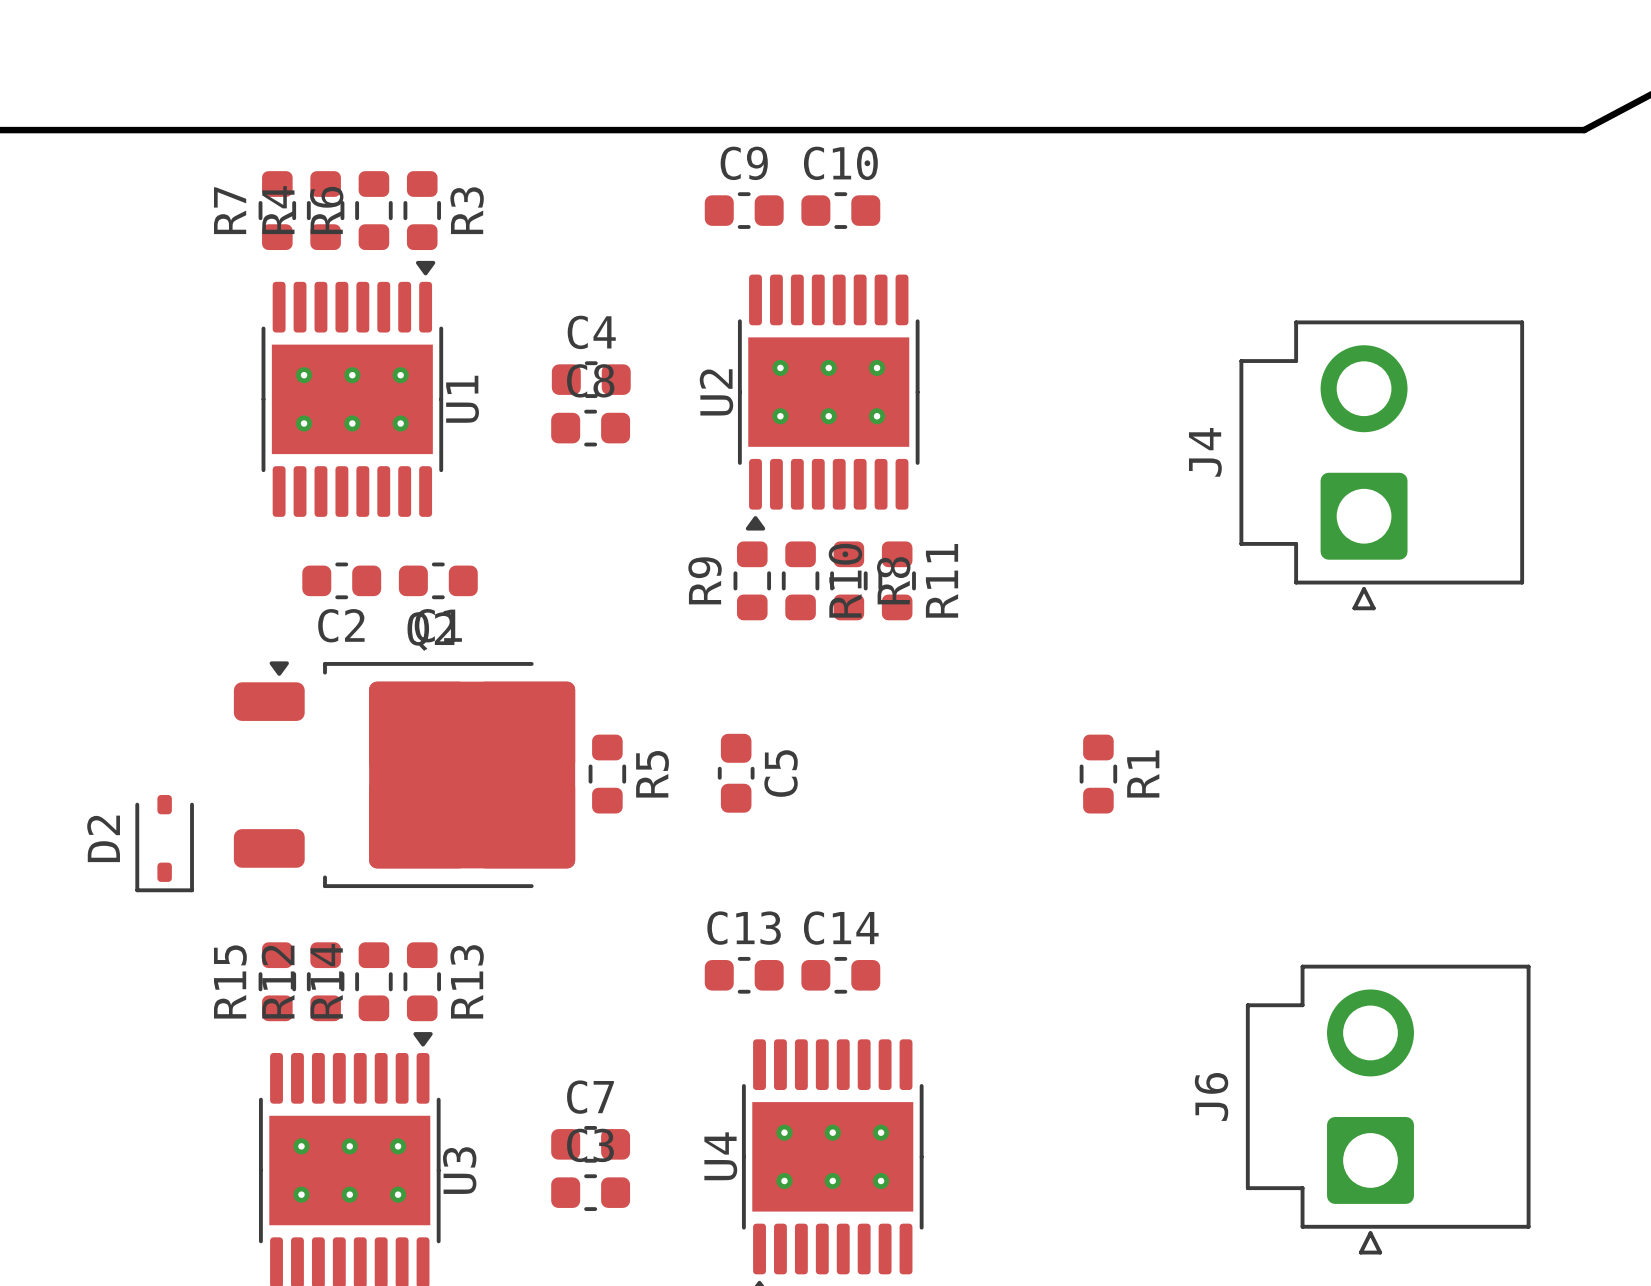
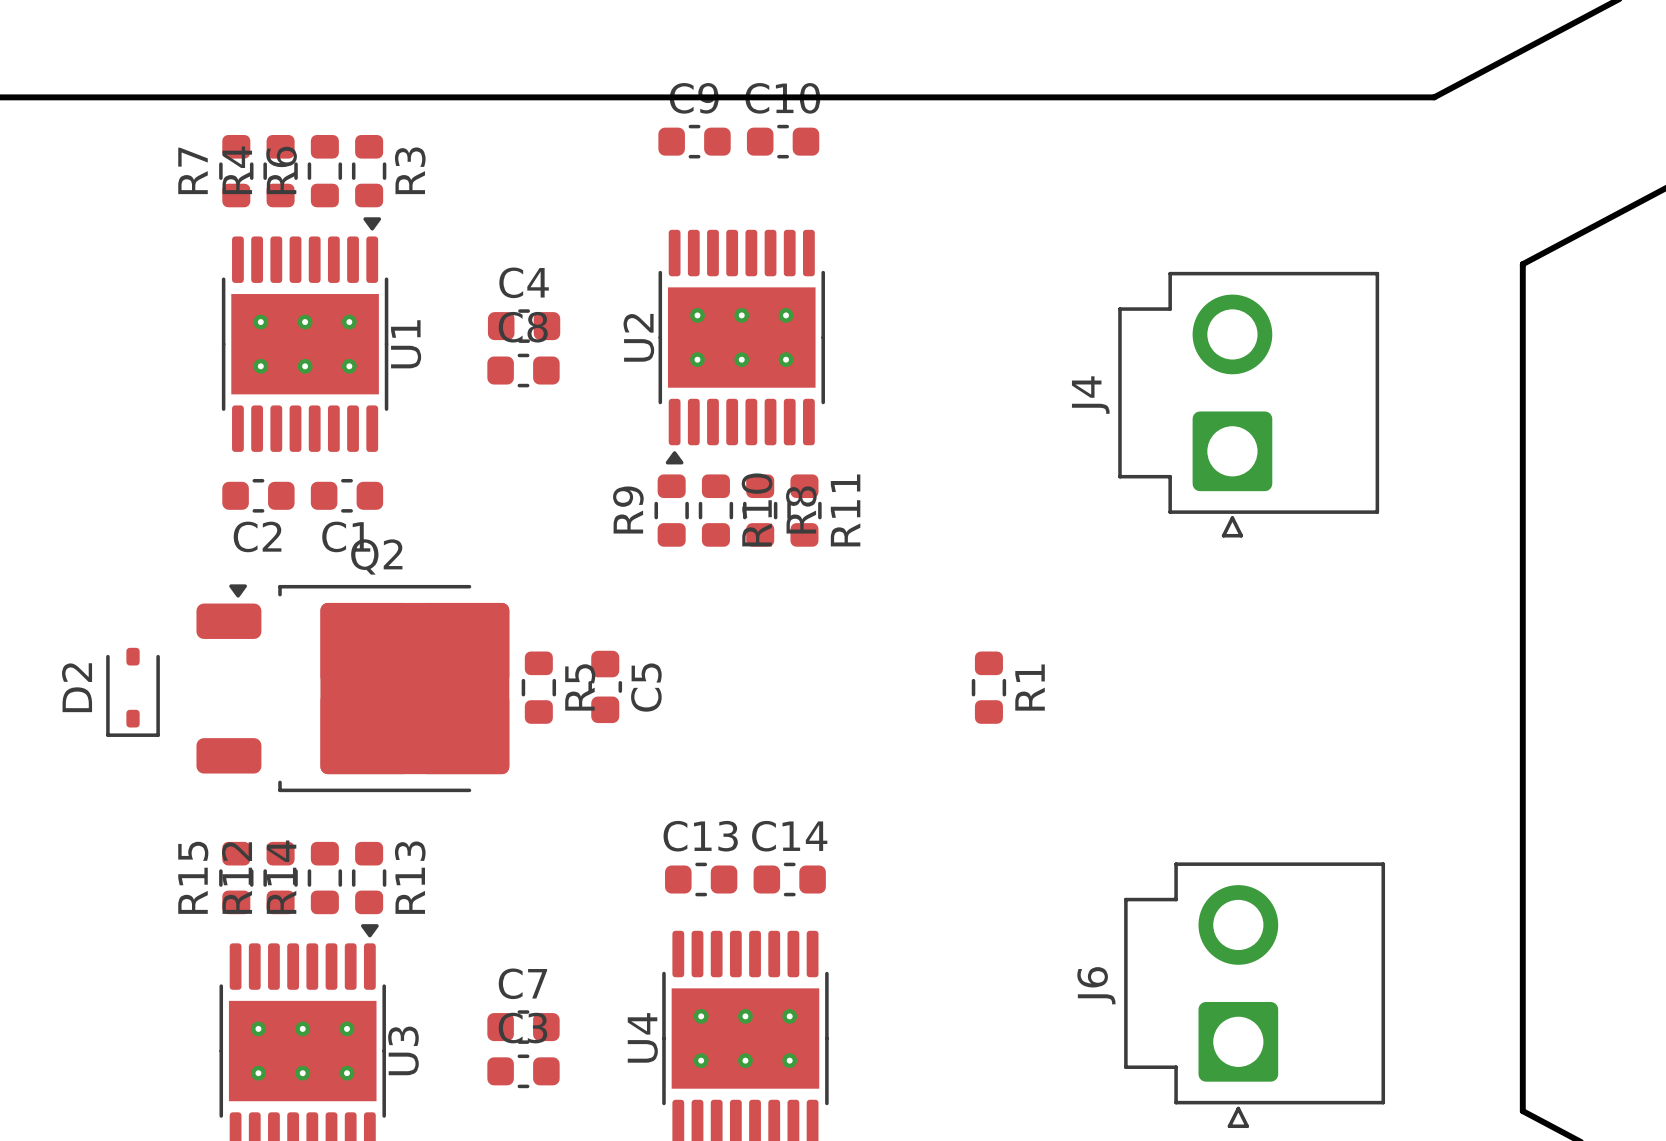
C9 position: (744, 210) -> (694, 141)
C10 position: (840, 210) -> (783, 141)
C2 position: (341, 580) -> (258, 495)
C1 position: (438, 580) -> (346, 495)
C5 position: (736, 773) -> (605, 686)
D2 position: (164, 843) -> (133, 692)
C13 position: (744, 975) -> (701, 879)
C14 position: (840, 975) -> (789, 879)

